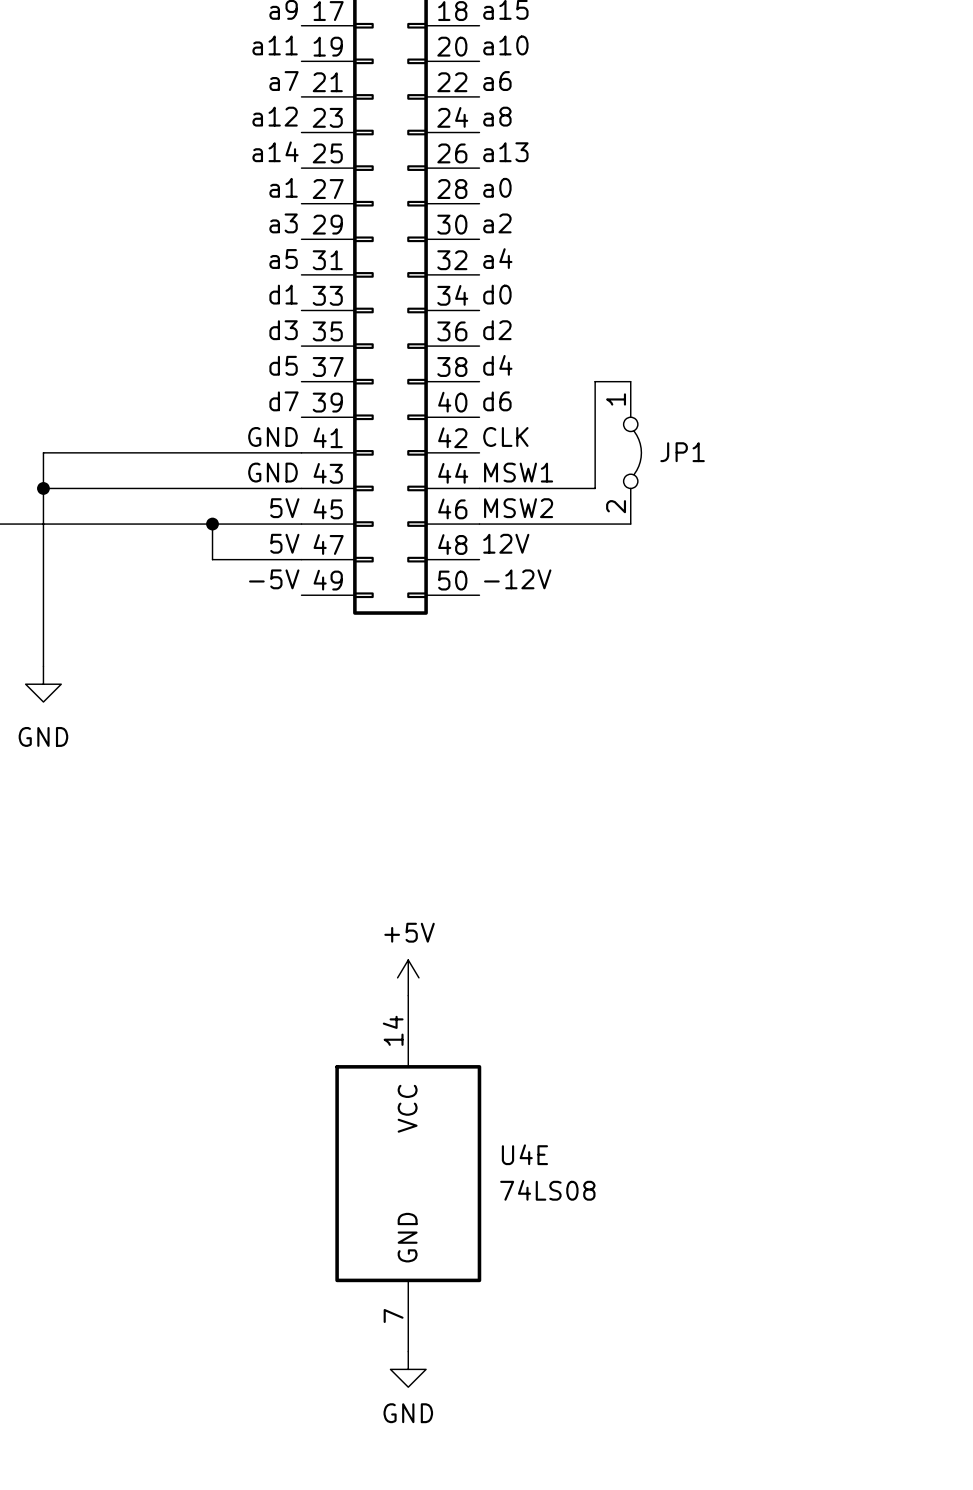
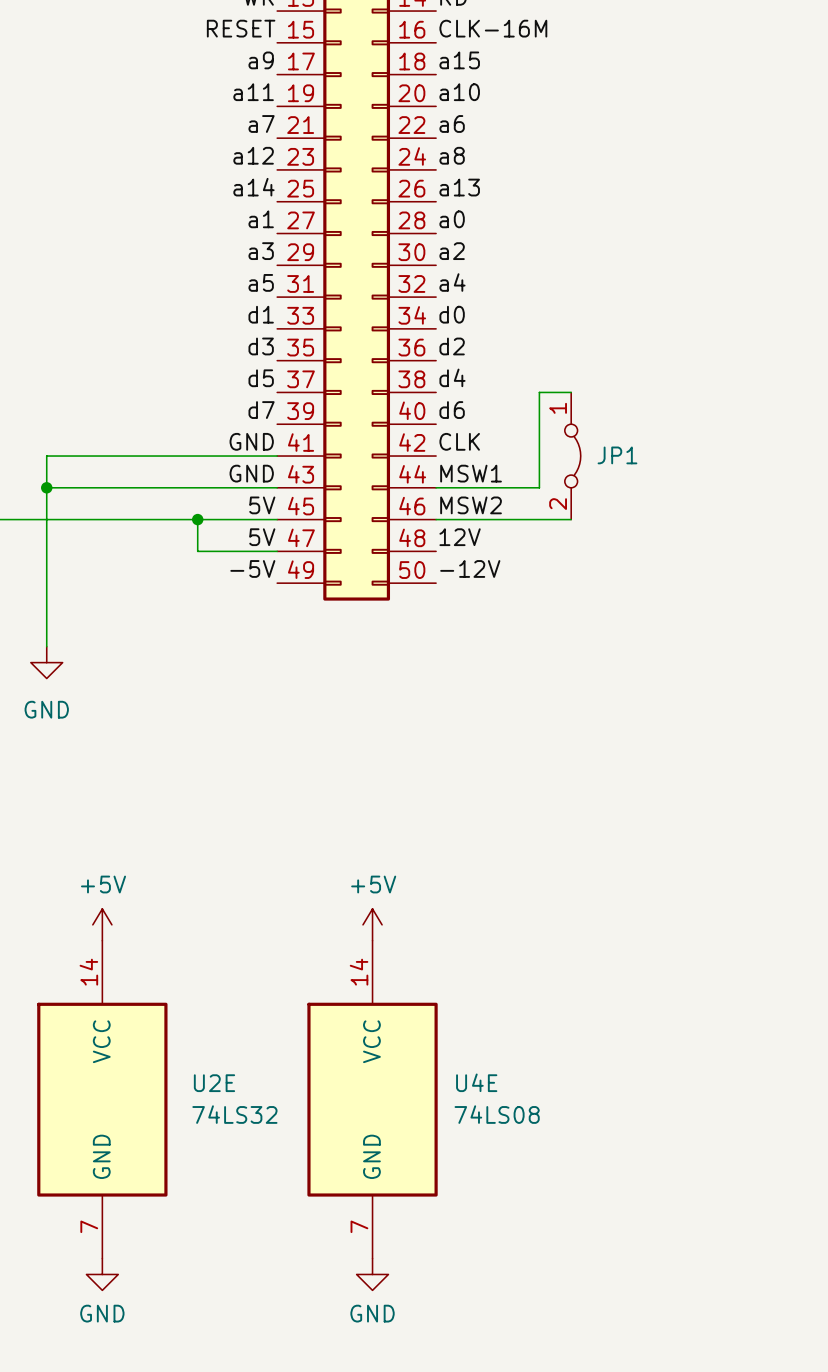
power symbol: none -> +5V (102, 924)
U2E: none -> 74LS32 (102, 1099)
power symbol: none -> GND (102, 1274)

